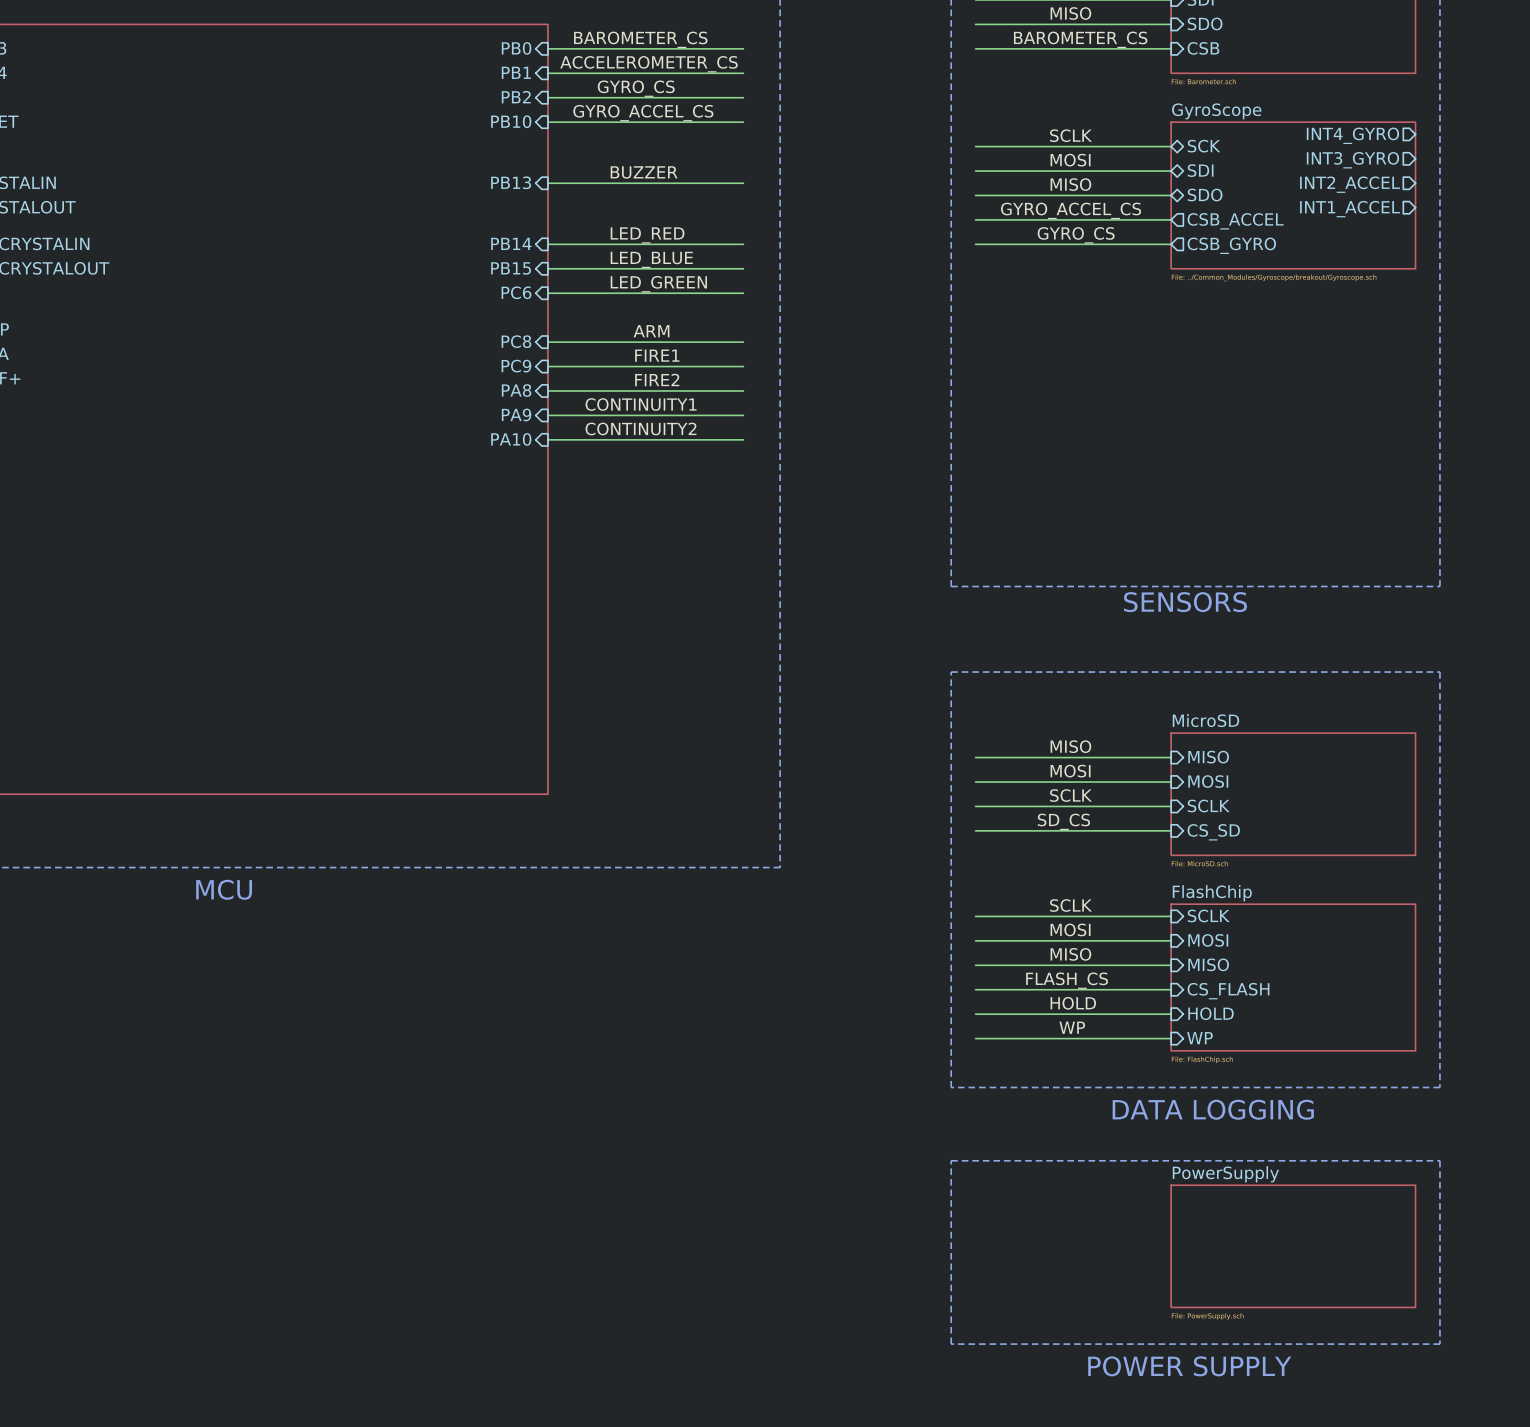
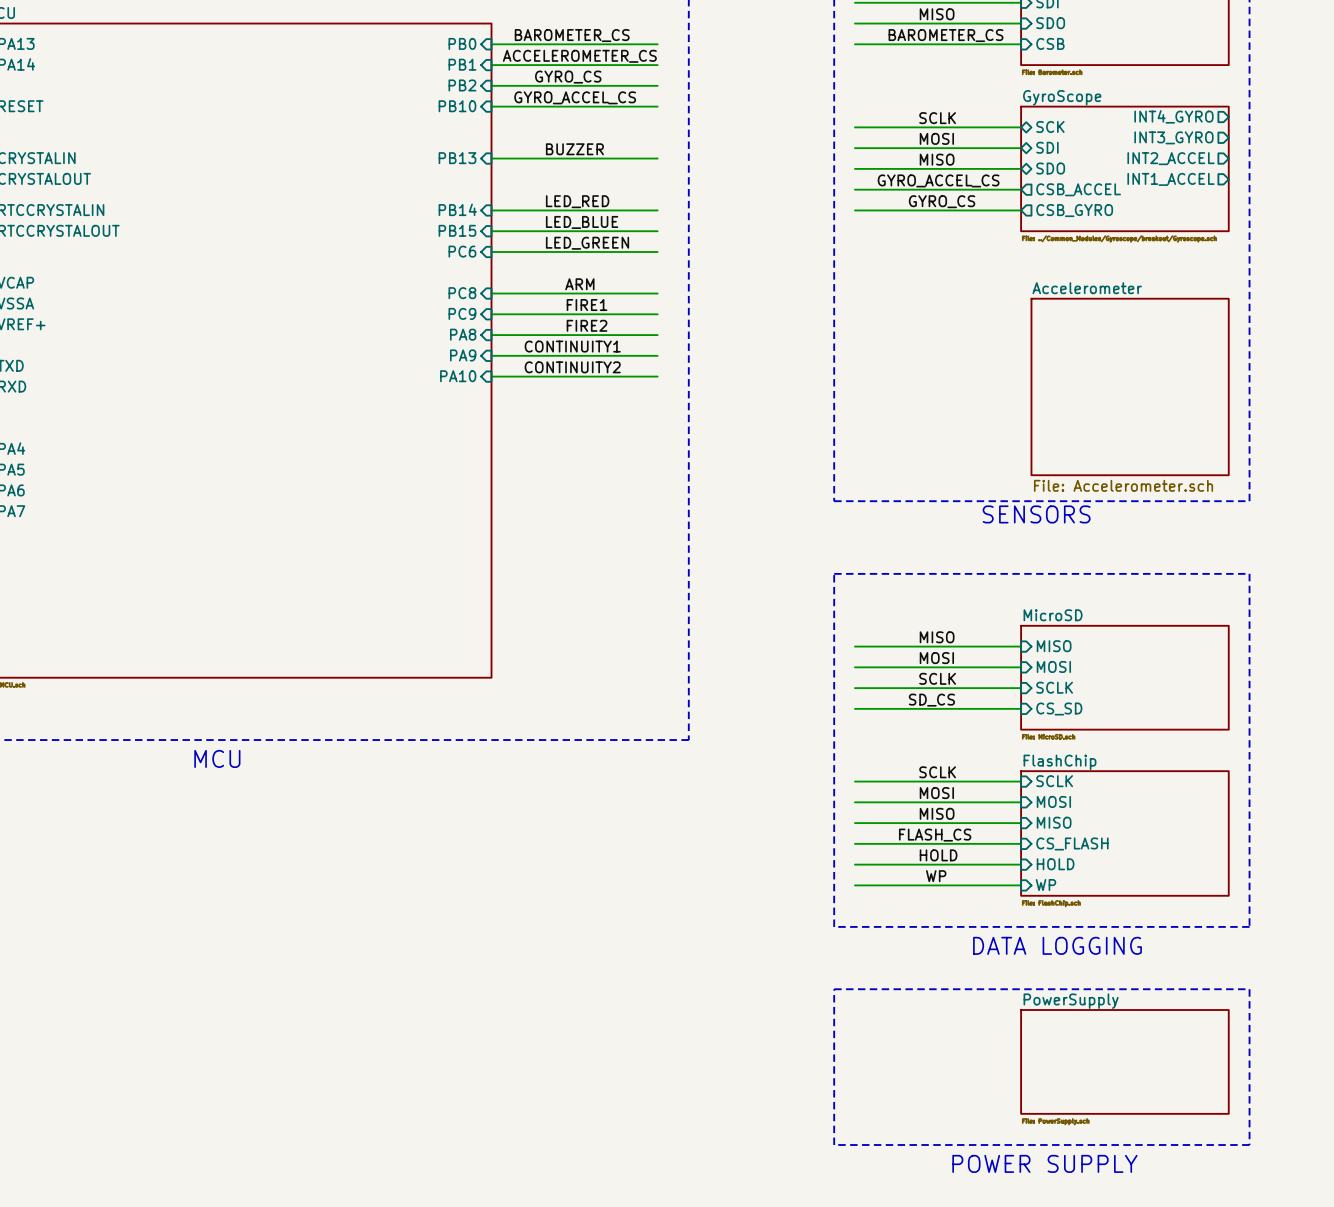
sheet Accelerometer: none -> File: Accelerometer.sch (1130, 386)

